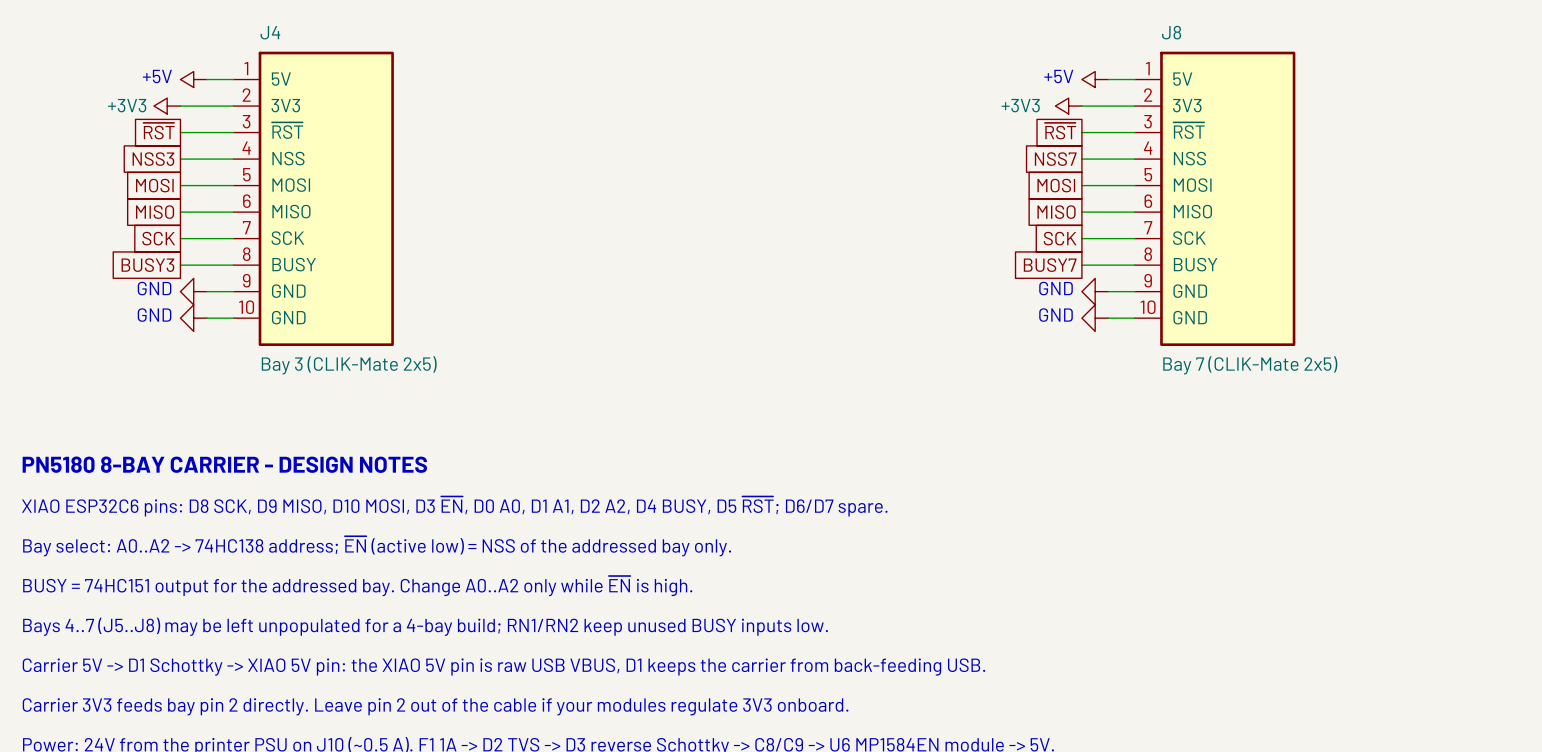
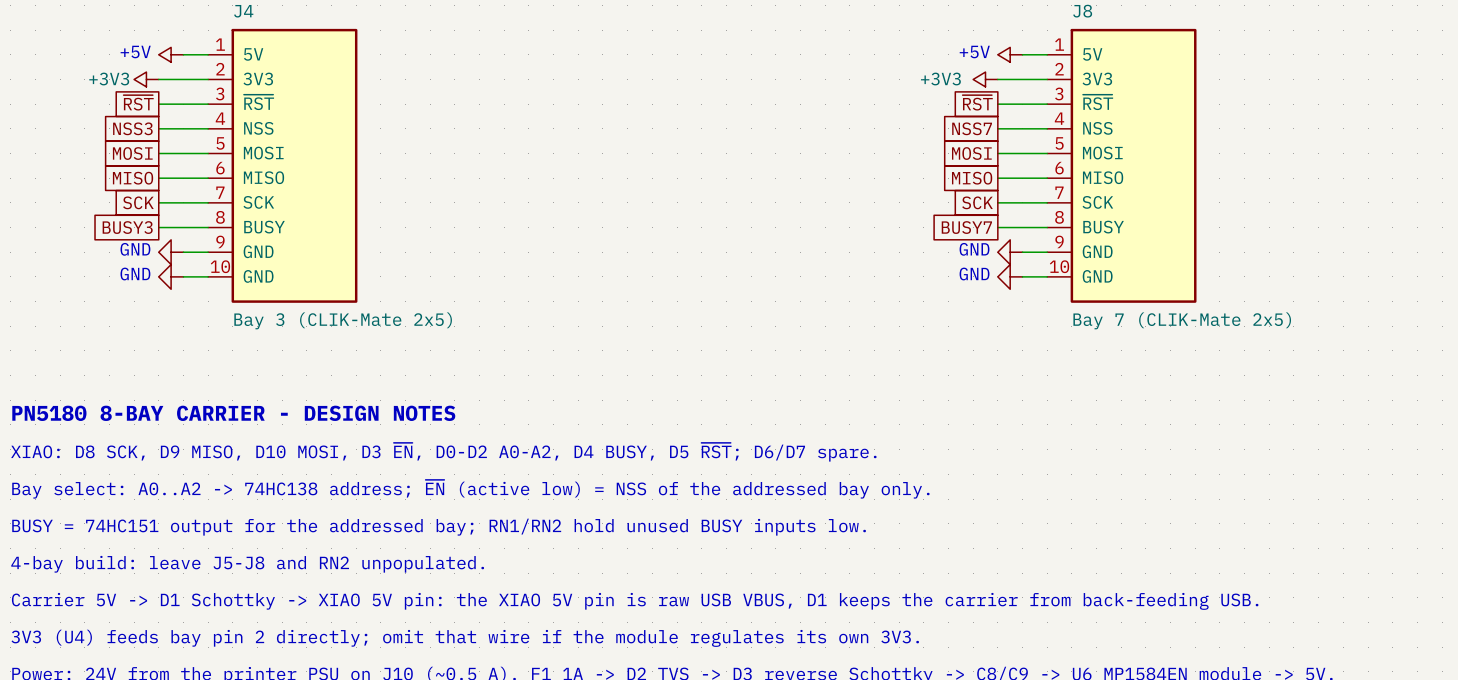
text: XIAO ESP32C6 pins: D8 SCK, D9 MISO, D10 MOSI, D3 ~{EN}, D0 A0, D1 A1, D2 A2, D4 BUSY, D5 ~{RST}; D6/D7 spare. (454, 506) -> XIAO: D8 SCK, D9 MISO, D10 MOSI, D3 ~{EN}, D0-D2 A0-A2, D4 BUSY, D5 ~{RST}; D6/D7 spare. (443, 452)
text: BUSY = 74HC151 output for the addressed bay. Change A0..A2 only while ~{EN} is high. (357, 586) -> BUSY = 74HC151 output for the addressed bay; RN1/RN2 hold unused BUSY inputs low. (439, 527)
text: Bays 4..7 (J5..J8) may be left unpopulated for a 4-bay build; RN1/RN2 keep unused BUSY inputs low. (425, 626) -> 4-bay build: leave J5-J8 and RN2 unpopulated. (247, 564)
text: Carrier 3V3 feeds bay pin 2 directly. Leave pin 2 out of the cable if your modules regulate 3V3 onboard. (435, 706) -> 3V3 (U4) feeds bay pin 2 directly; omit that wire if the module regulates its own 3V3. (465, 638)

